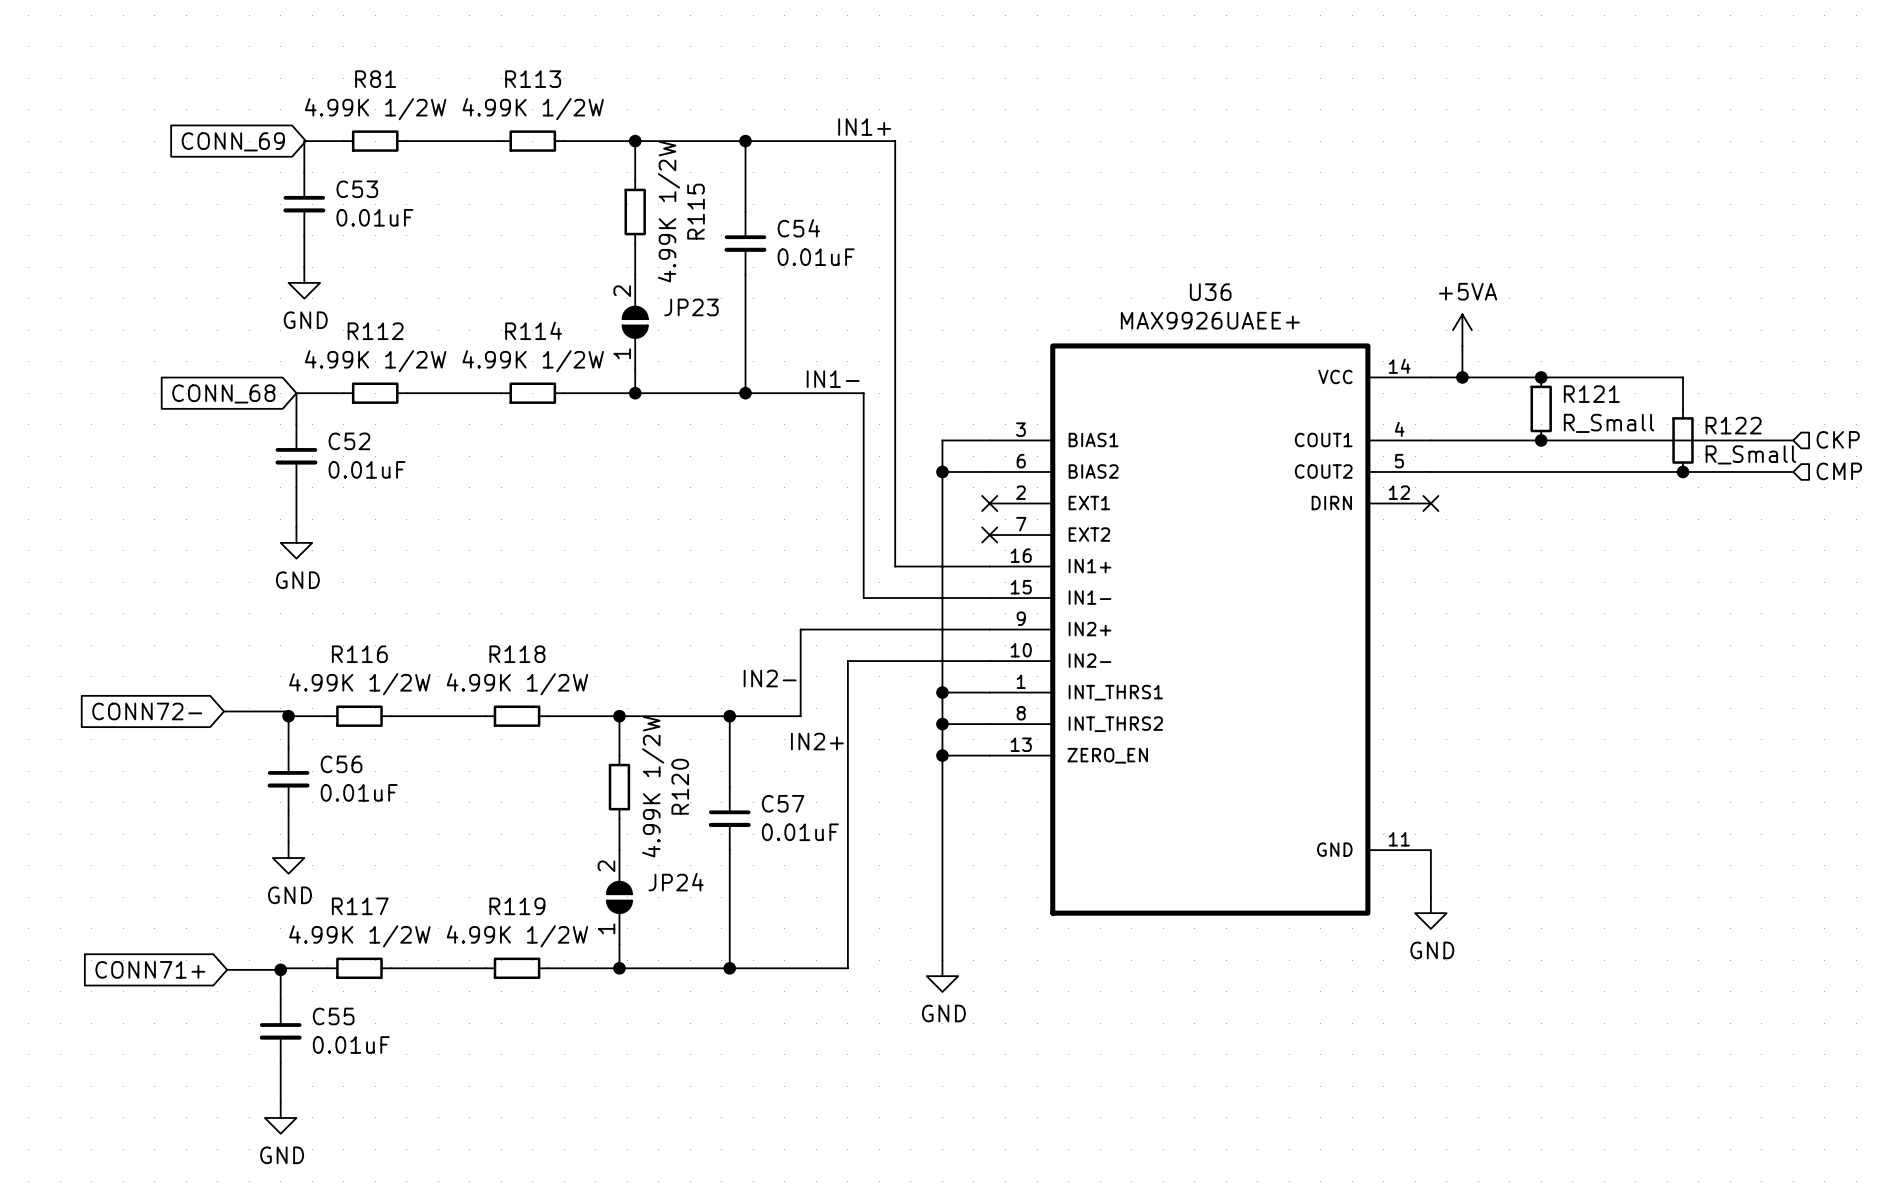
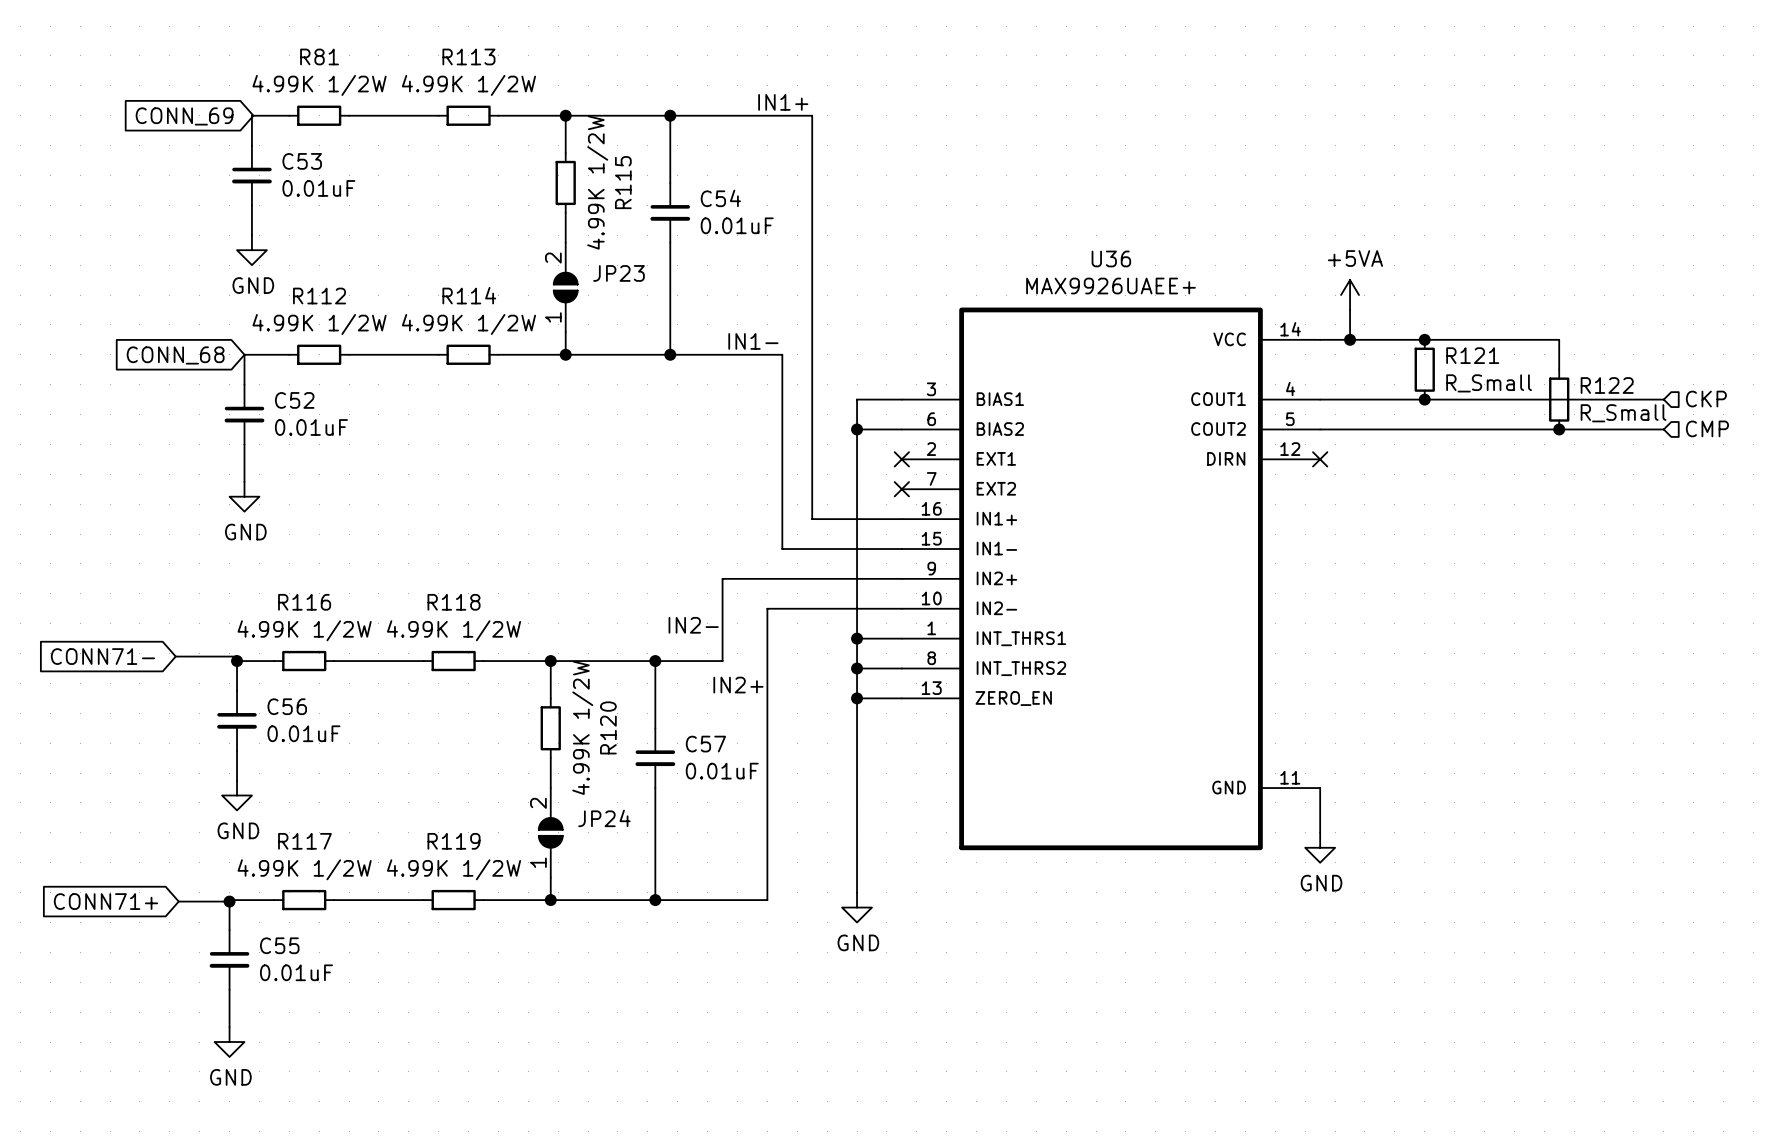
global label: CONN72- (147, 711) -> CONN71- (103, 656)

